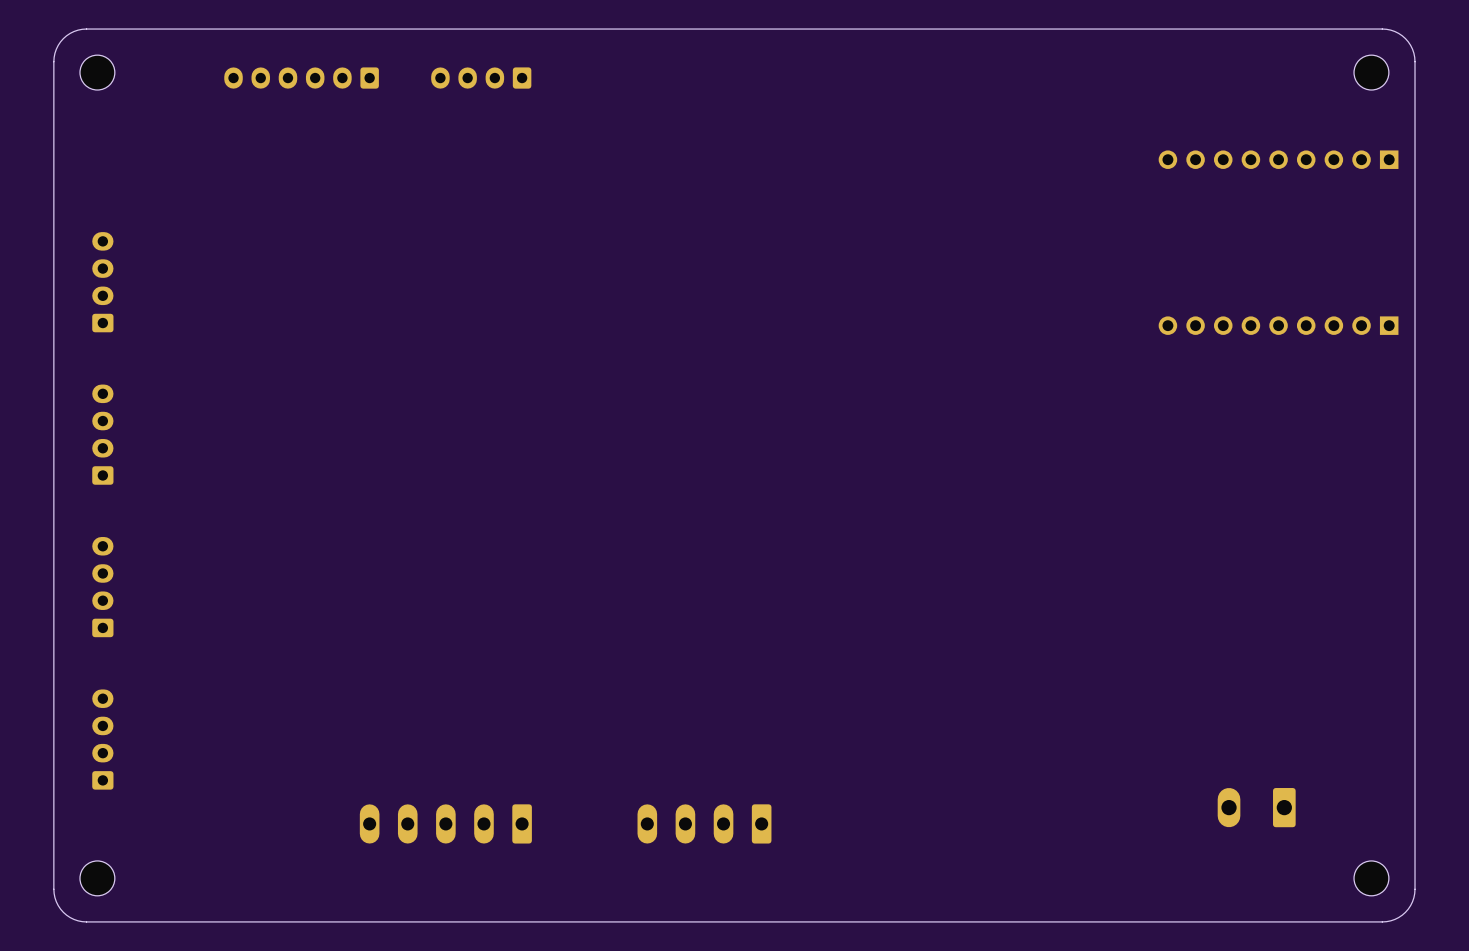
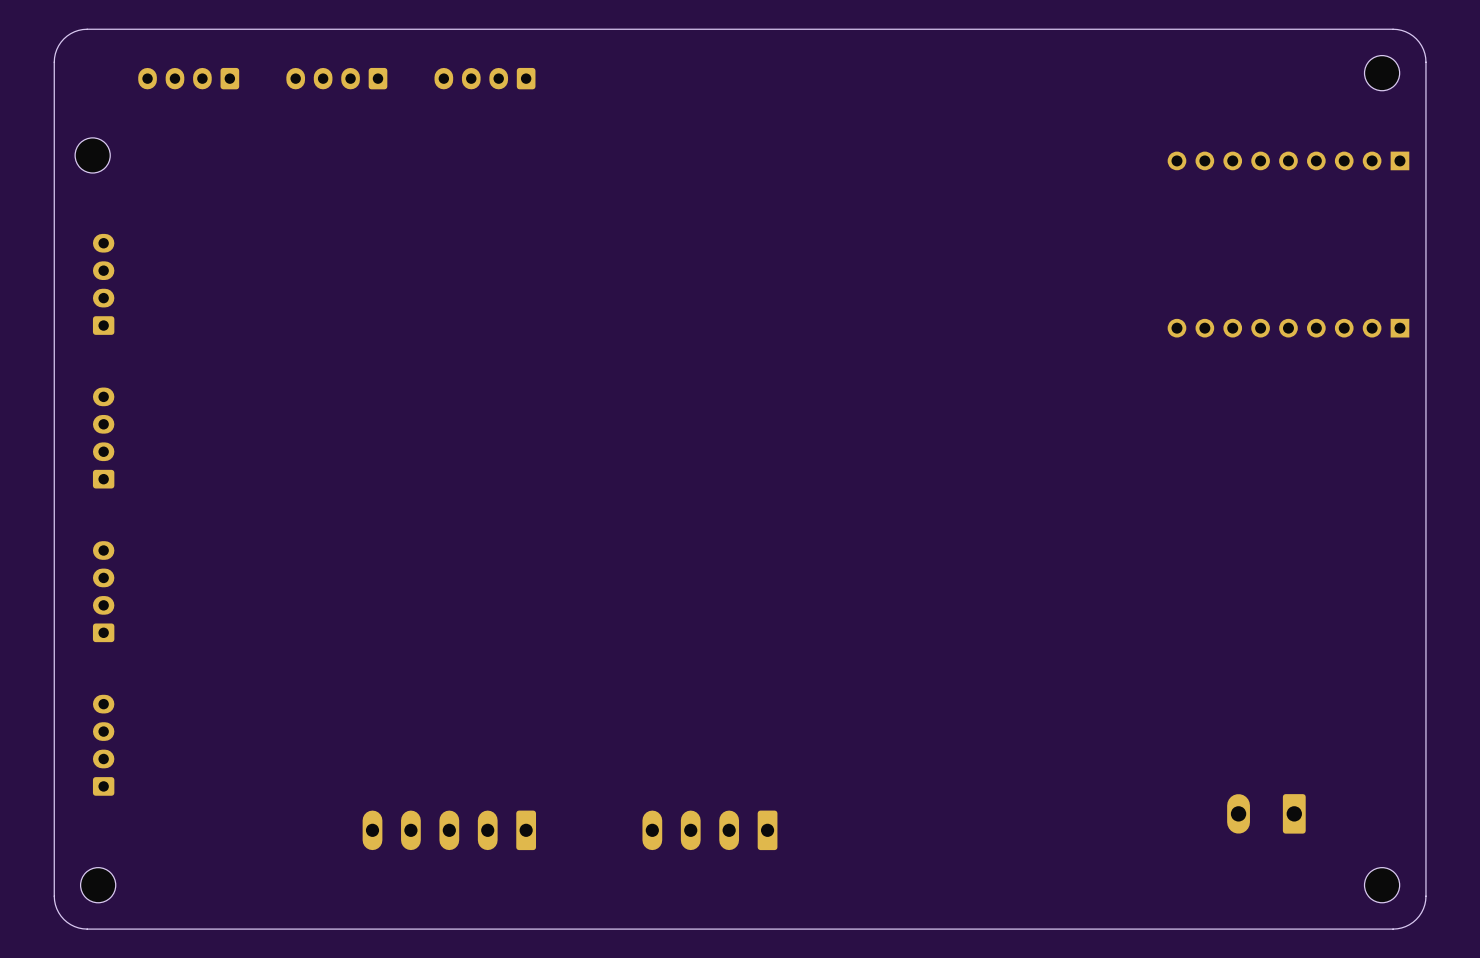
part position: (97, 72) -> (92, 155)
part: none -> (188, 78)
part: (301, 78) -> none
part: none -> (336, 78)

